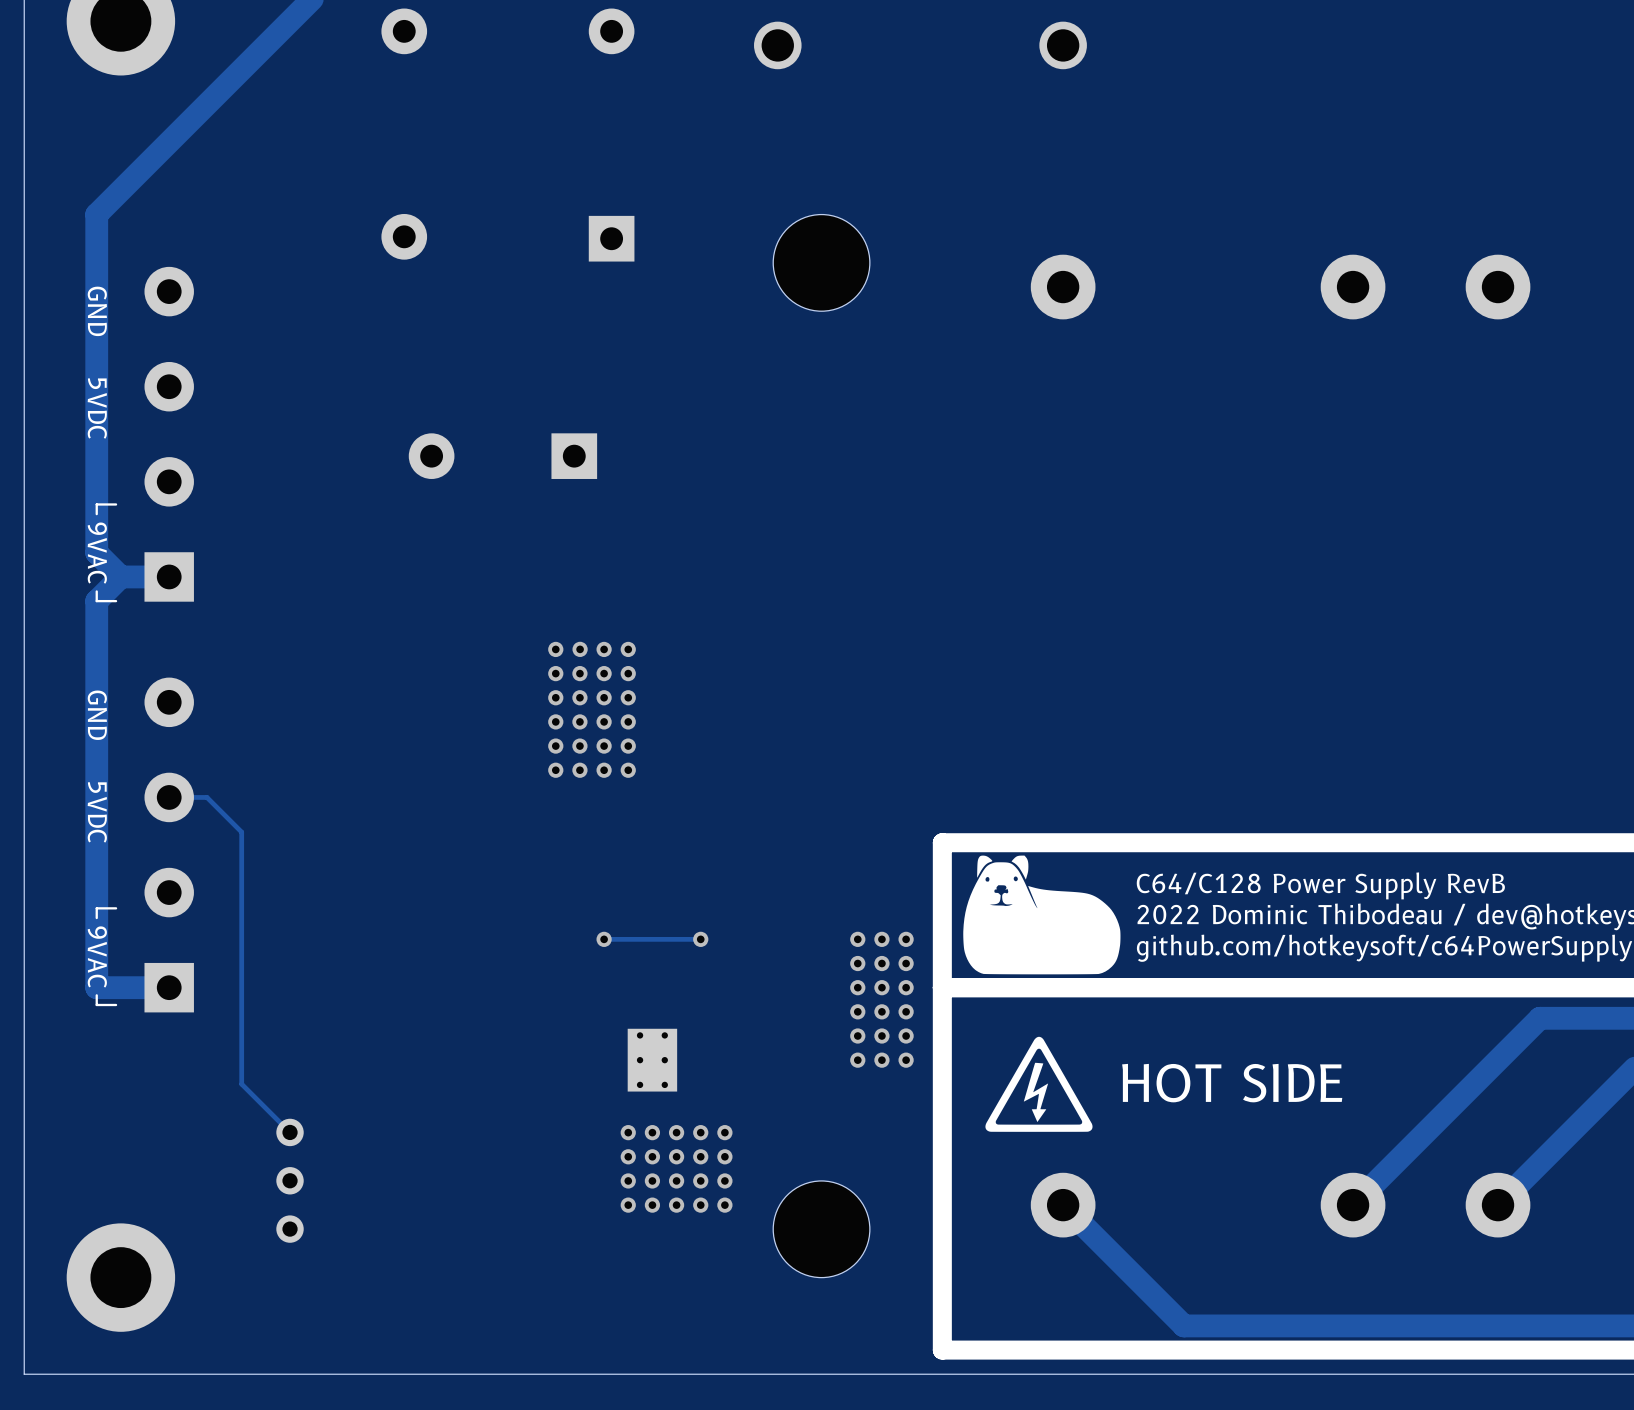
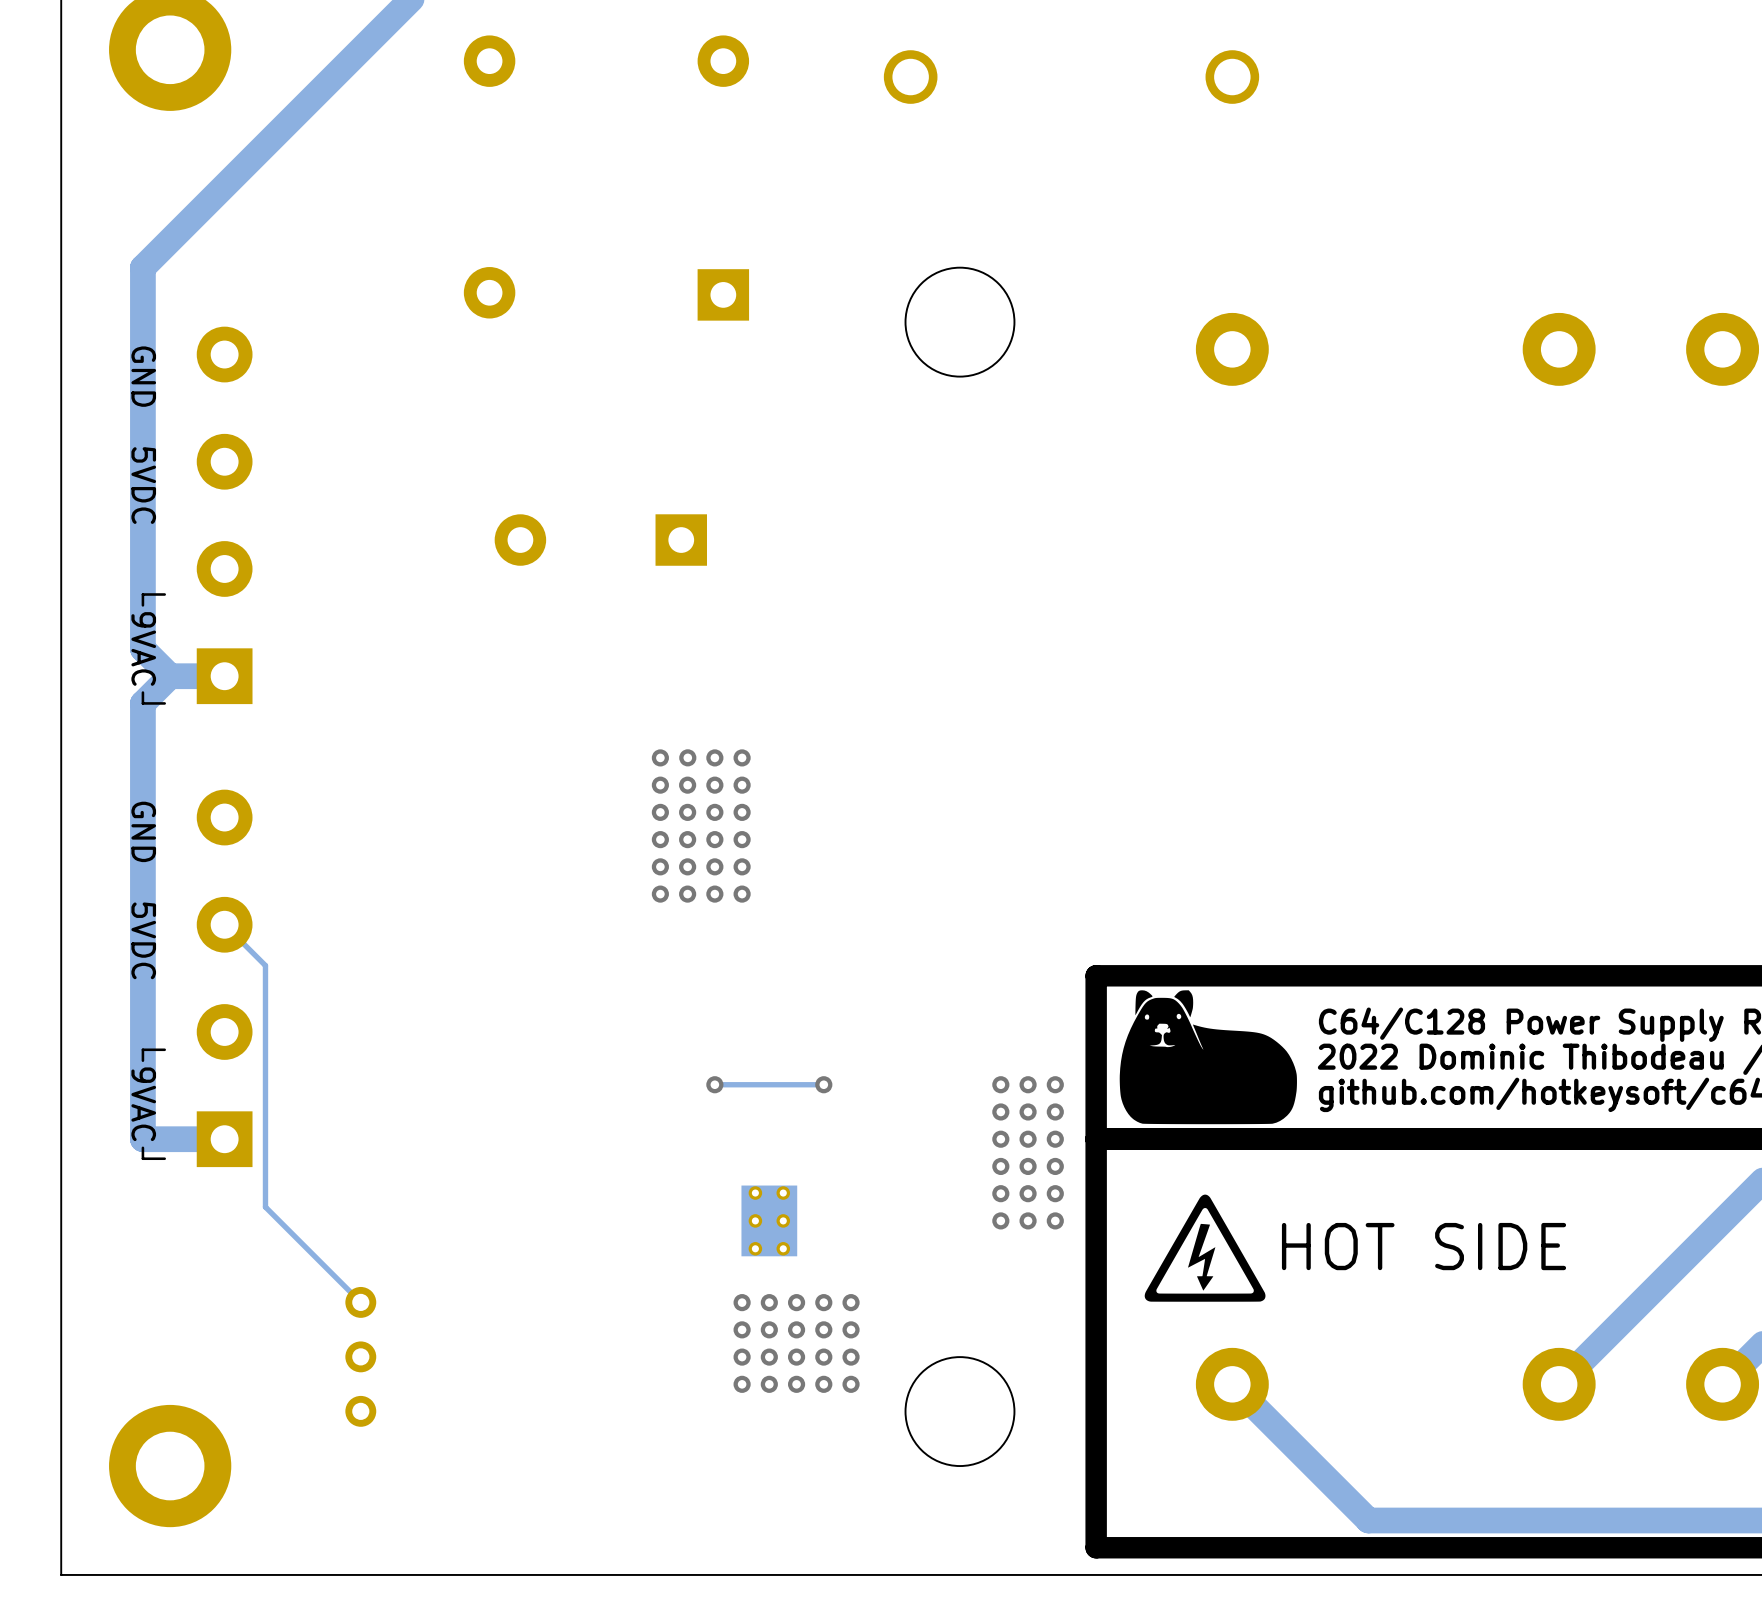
track: (169, 797) (206, 797) (241, 832) (241, 1084) -> (224, 924) (265, 965) (265, 1207) (306, 1247)

